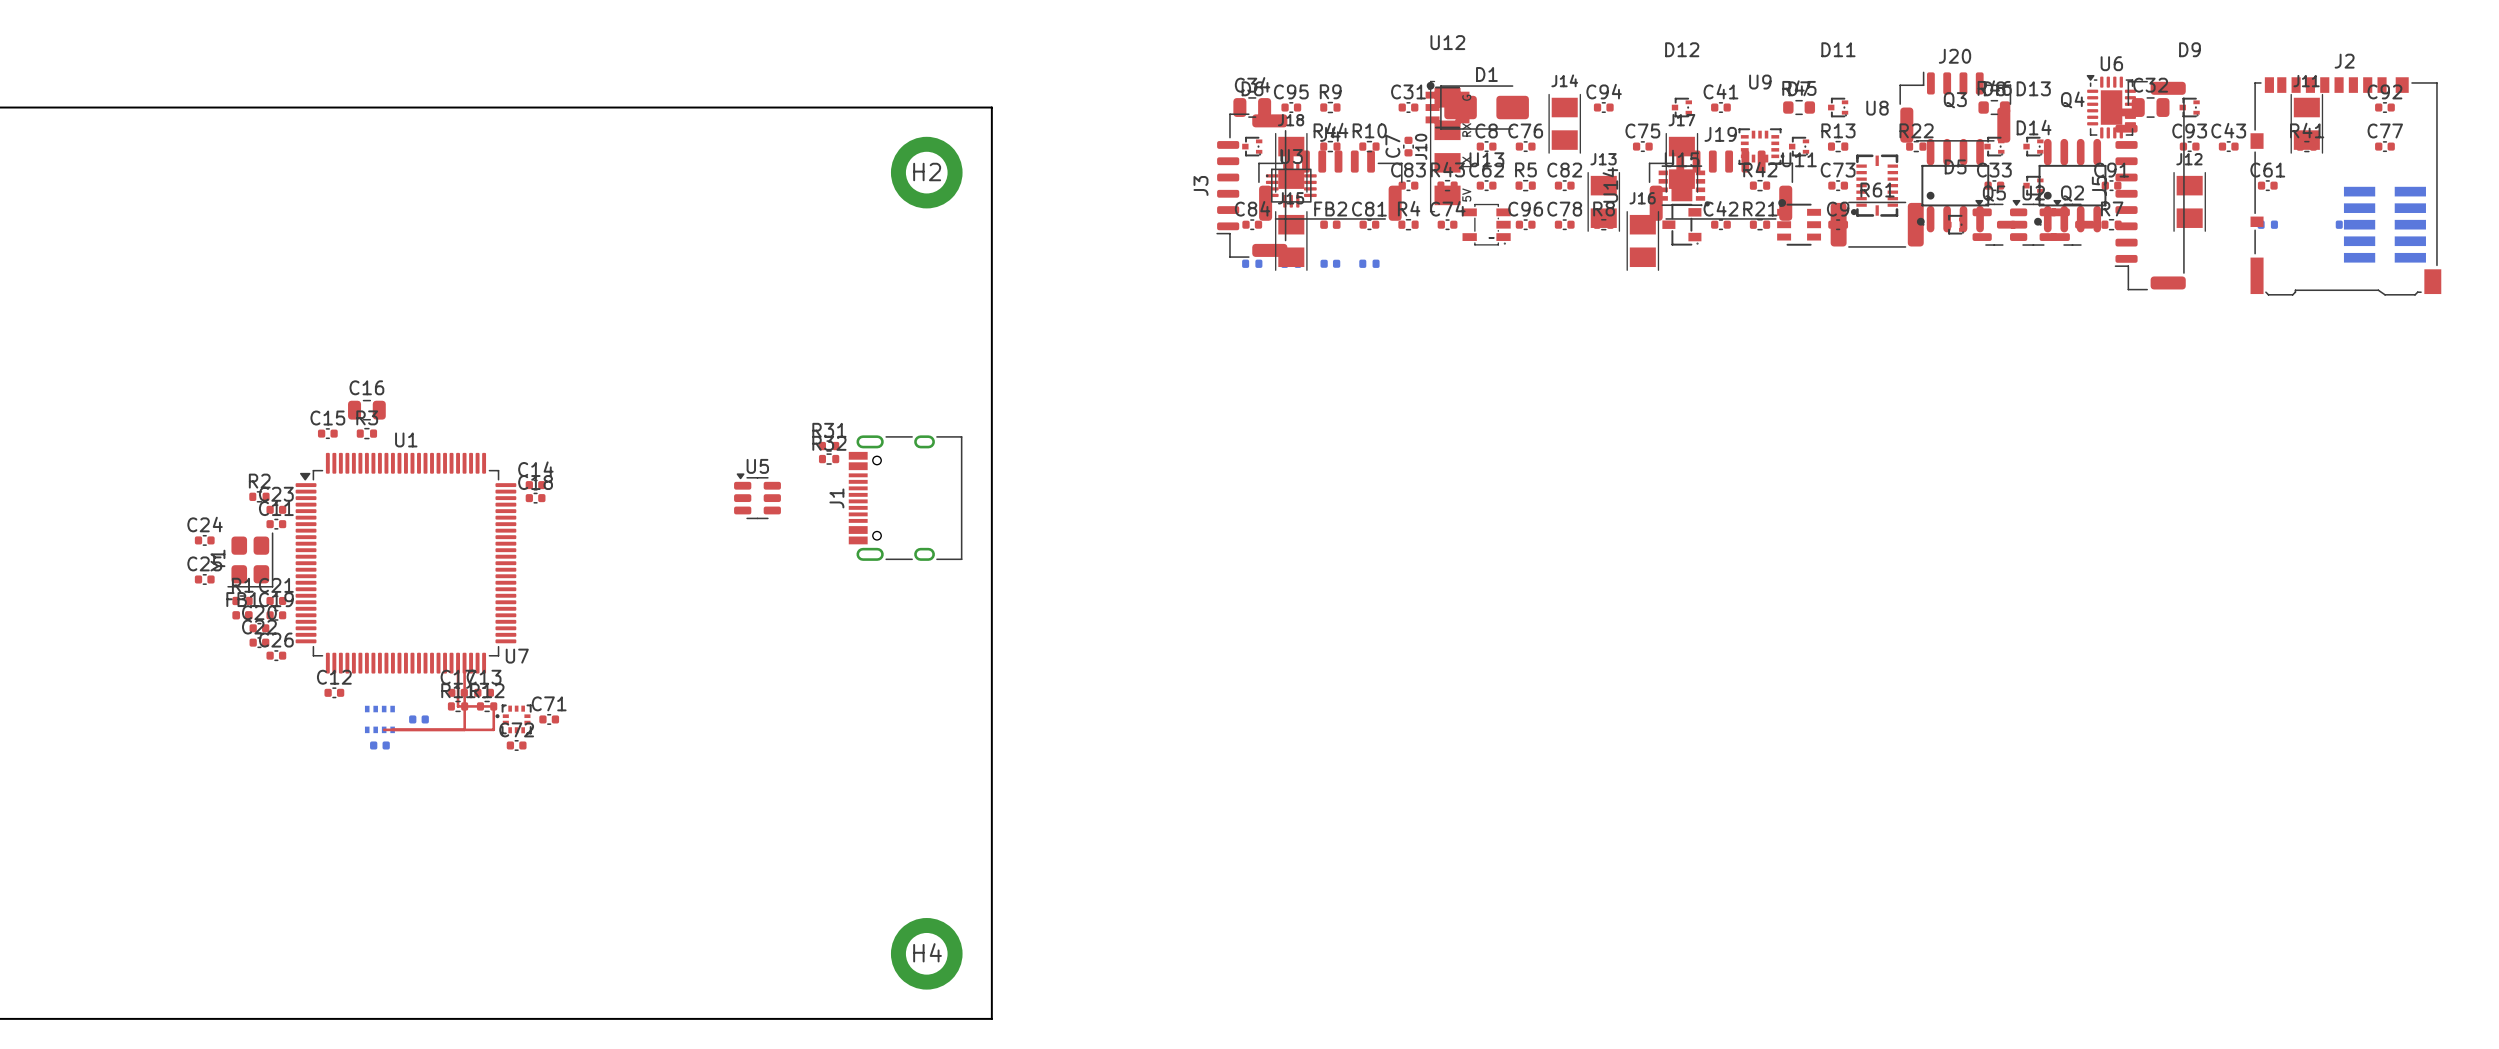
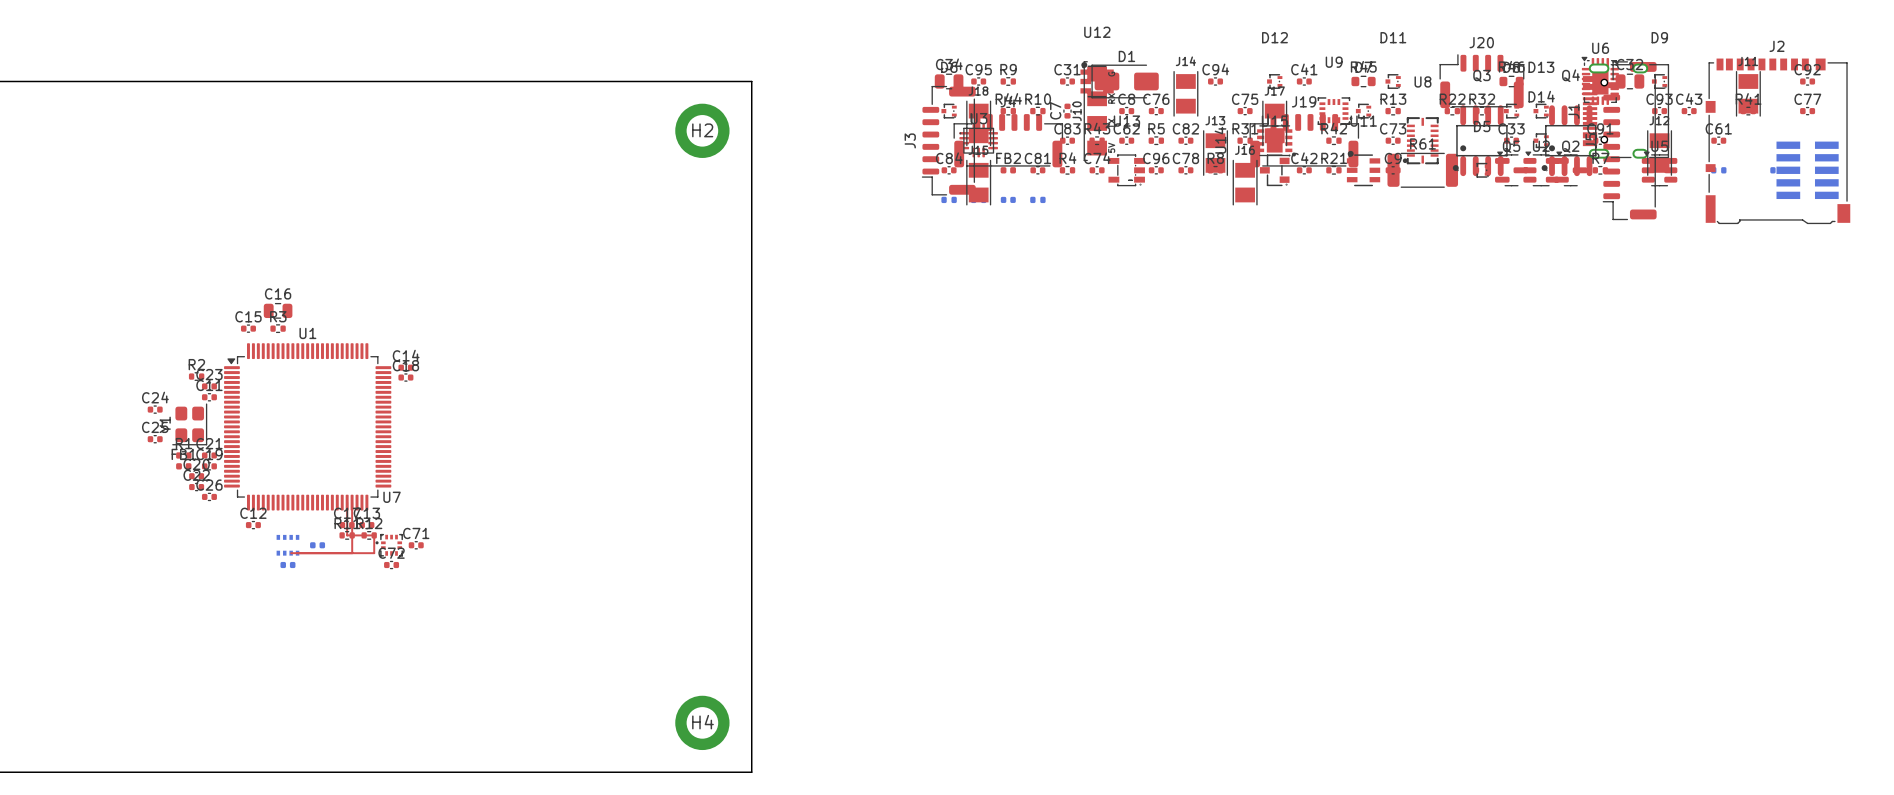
R31 position: (829, 446) -> (1245, 140)
R32 position: (829, 459) -> (1481, 111)
U5 position: (757, 496) -> (1659, 168)
J1 position: (905, 498) -> (1625, 111)

